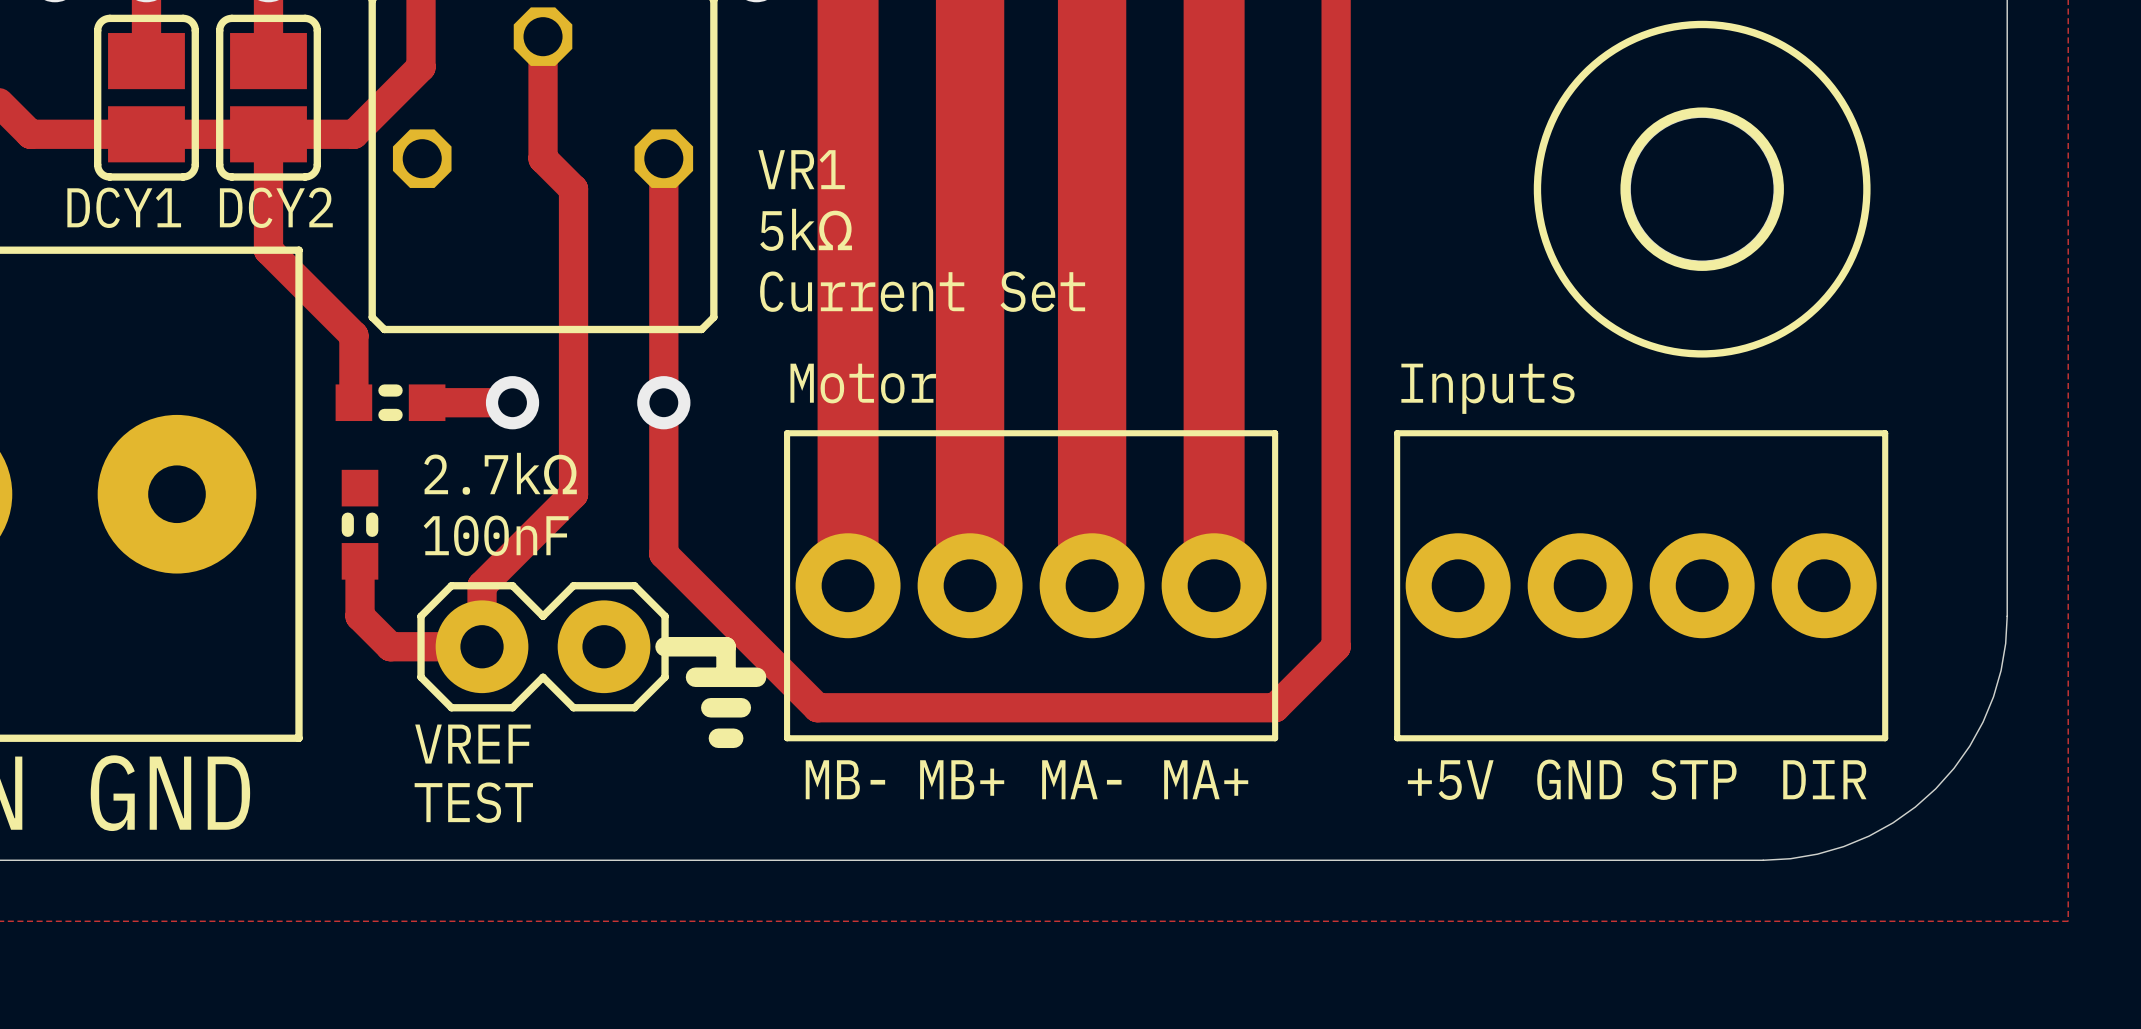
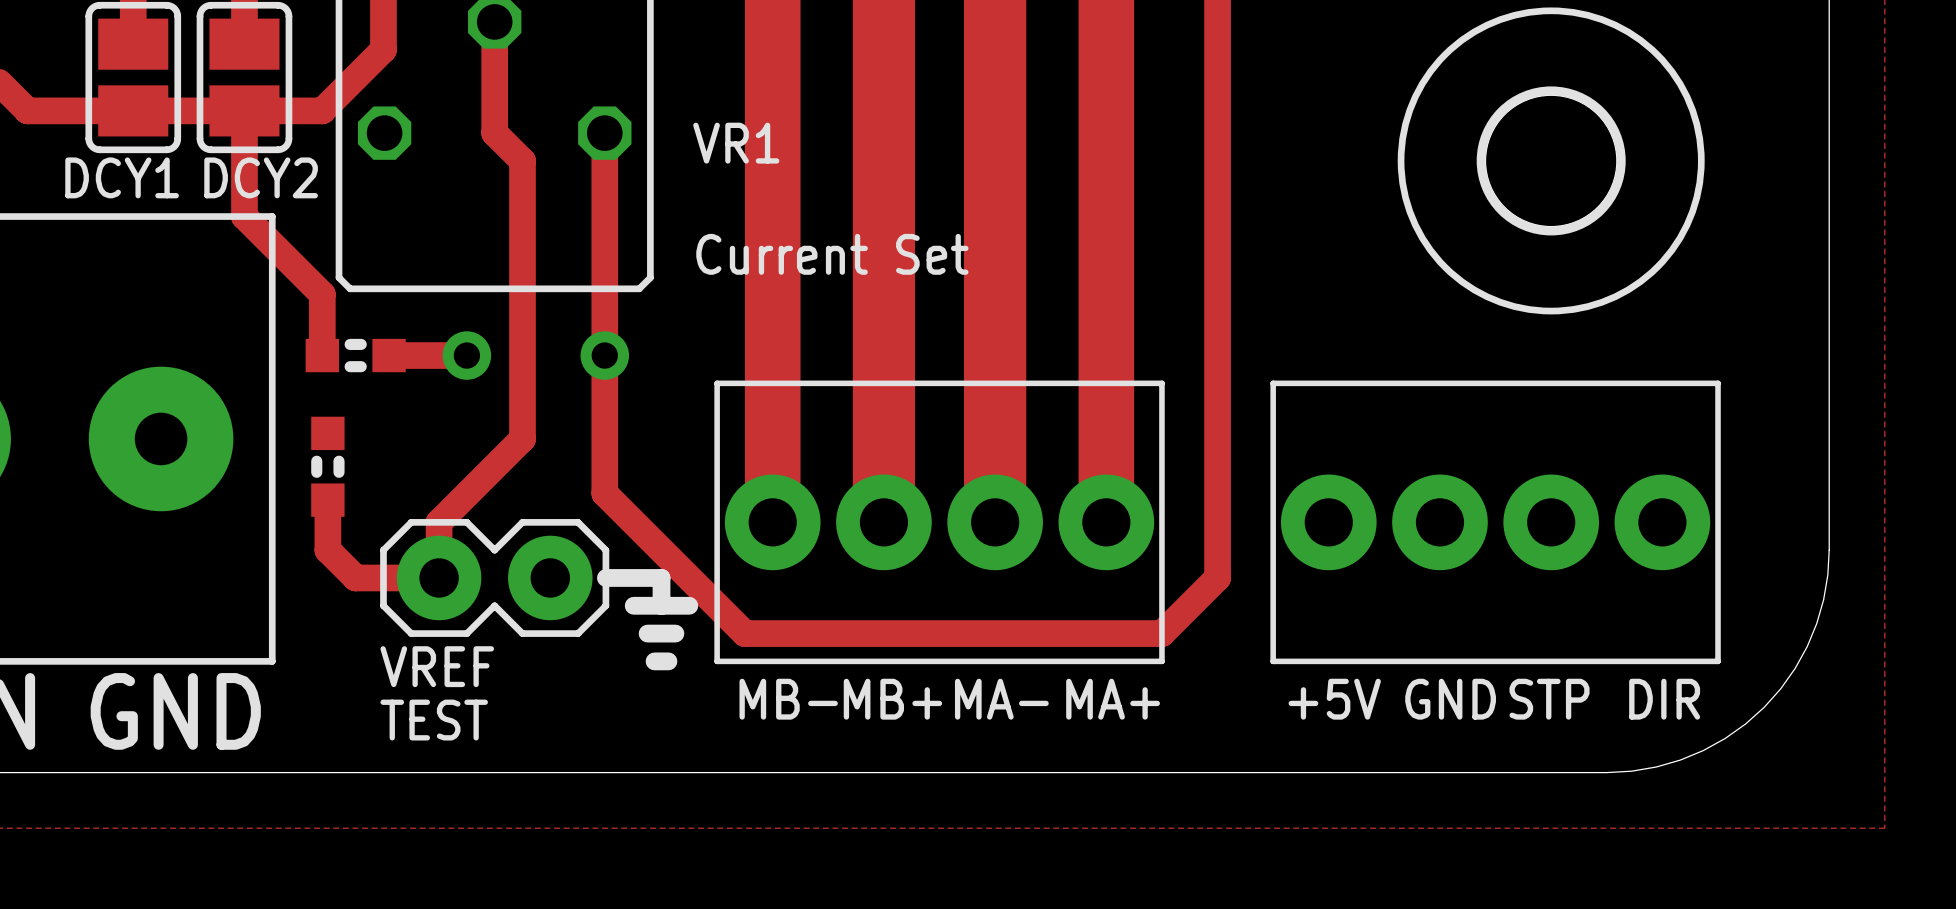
VR1 value: 5kΩ (806, 229) -> none
part value: Motor (863, 383) -> none
part value: Inputs (1487, 388) -> none
part value: 2.7kΩ (500, 473) -> none
part value: 100nF (496, 535) -> none

